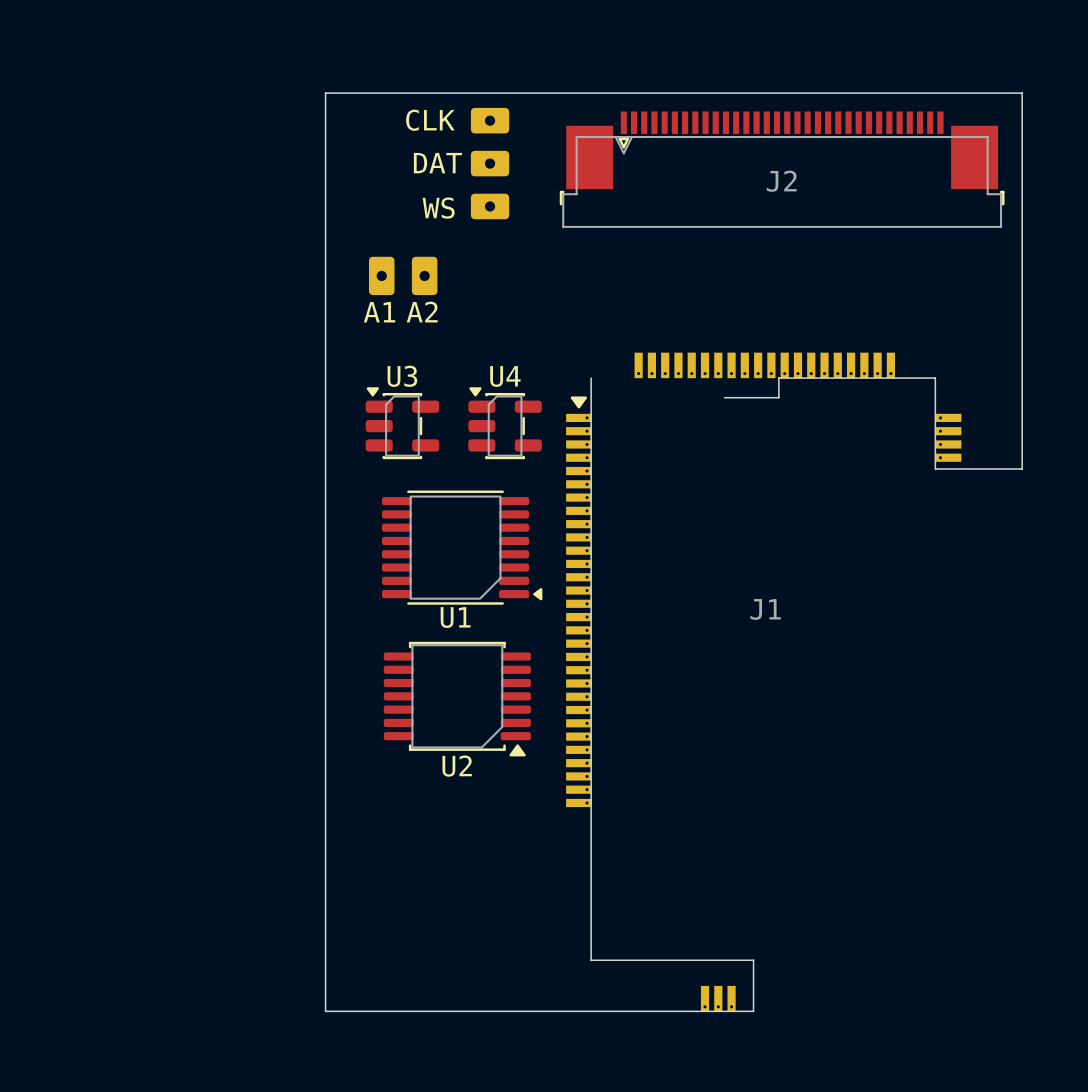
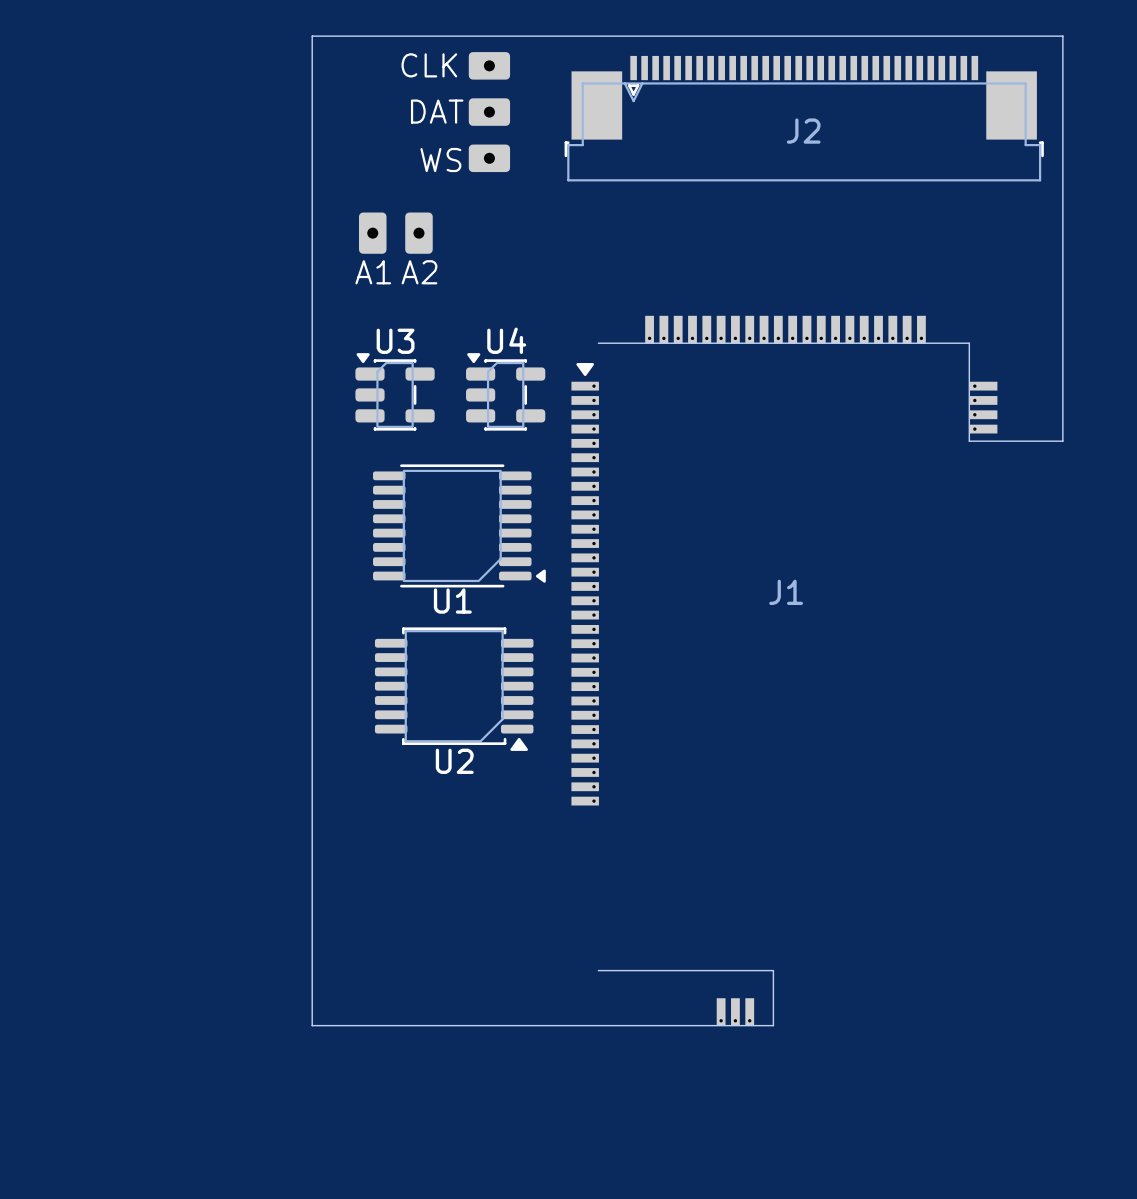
board edge: (591, 378) (591, 960) -> none
board edge: (778, 378) (778, 397) (724, 397) -> (800, 343) (598, 343)

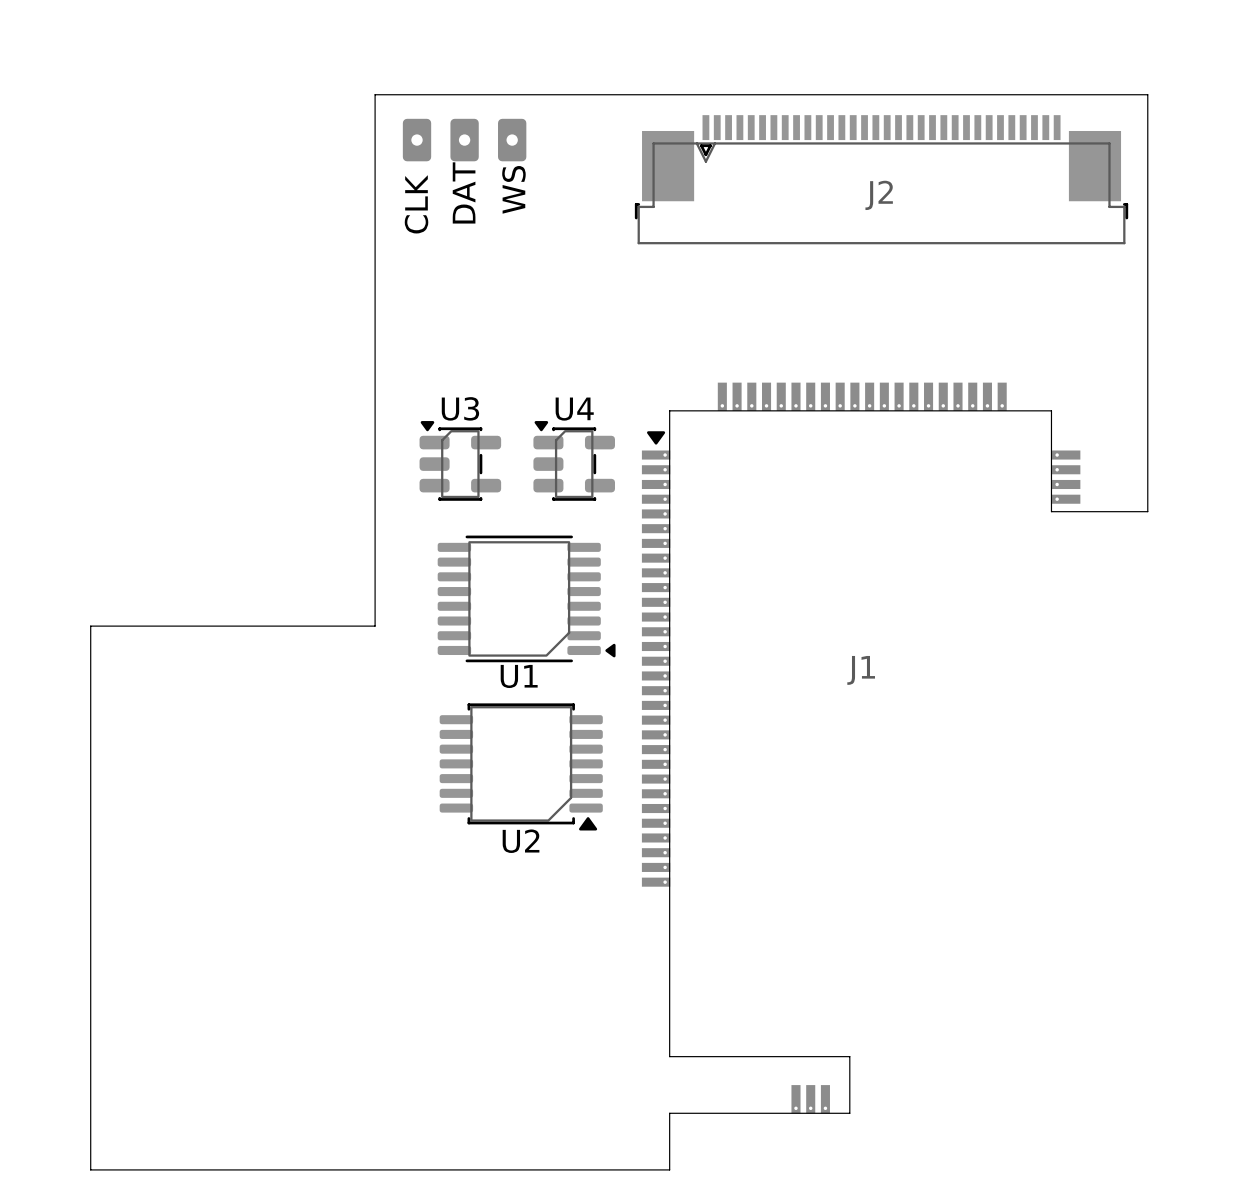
part rotation: 0° (489, 112) -> 90° counterclockwise (464, 140)
part position: (489, 112) -> (464, 140)
part: (395, 233) -> none
board edge: none -> (669, 410) (669, 1056)
board edge: (312, 552) (312, 1025) (598, 1025) -> (375, 626) (90, 626) (90, 1169) (669, 1169) (669, 1113)

